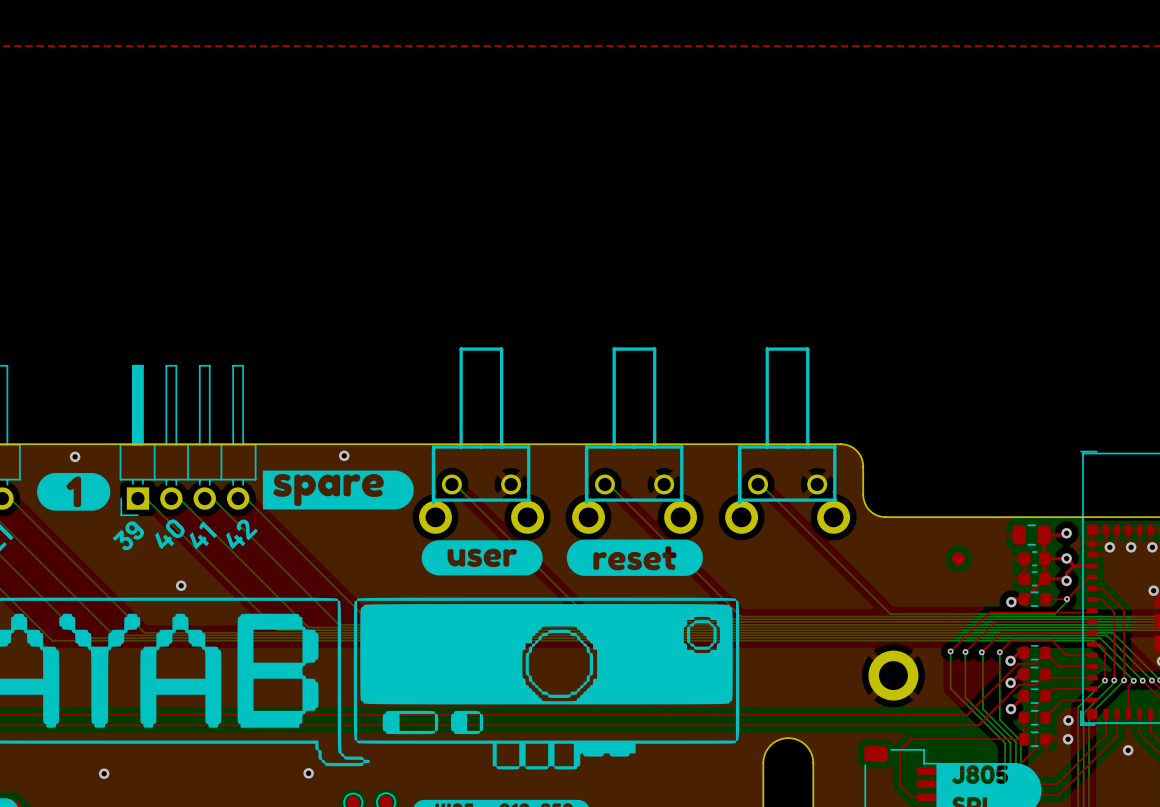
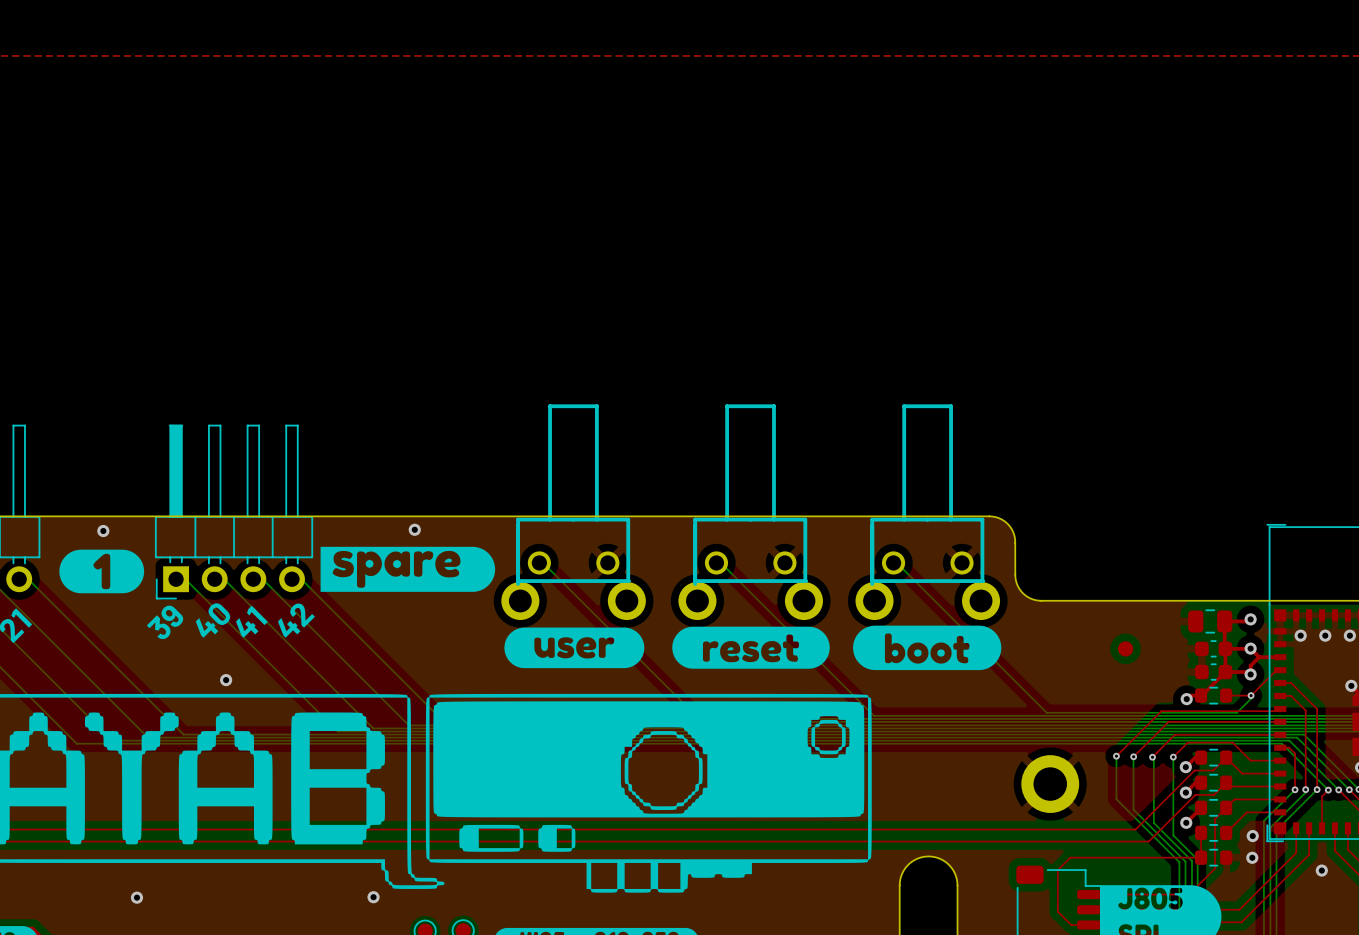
drawing: none -> [853, 625, 1002, 671]

